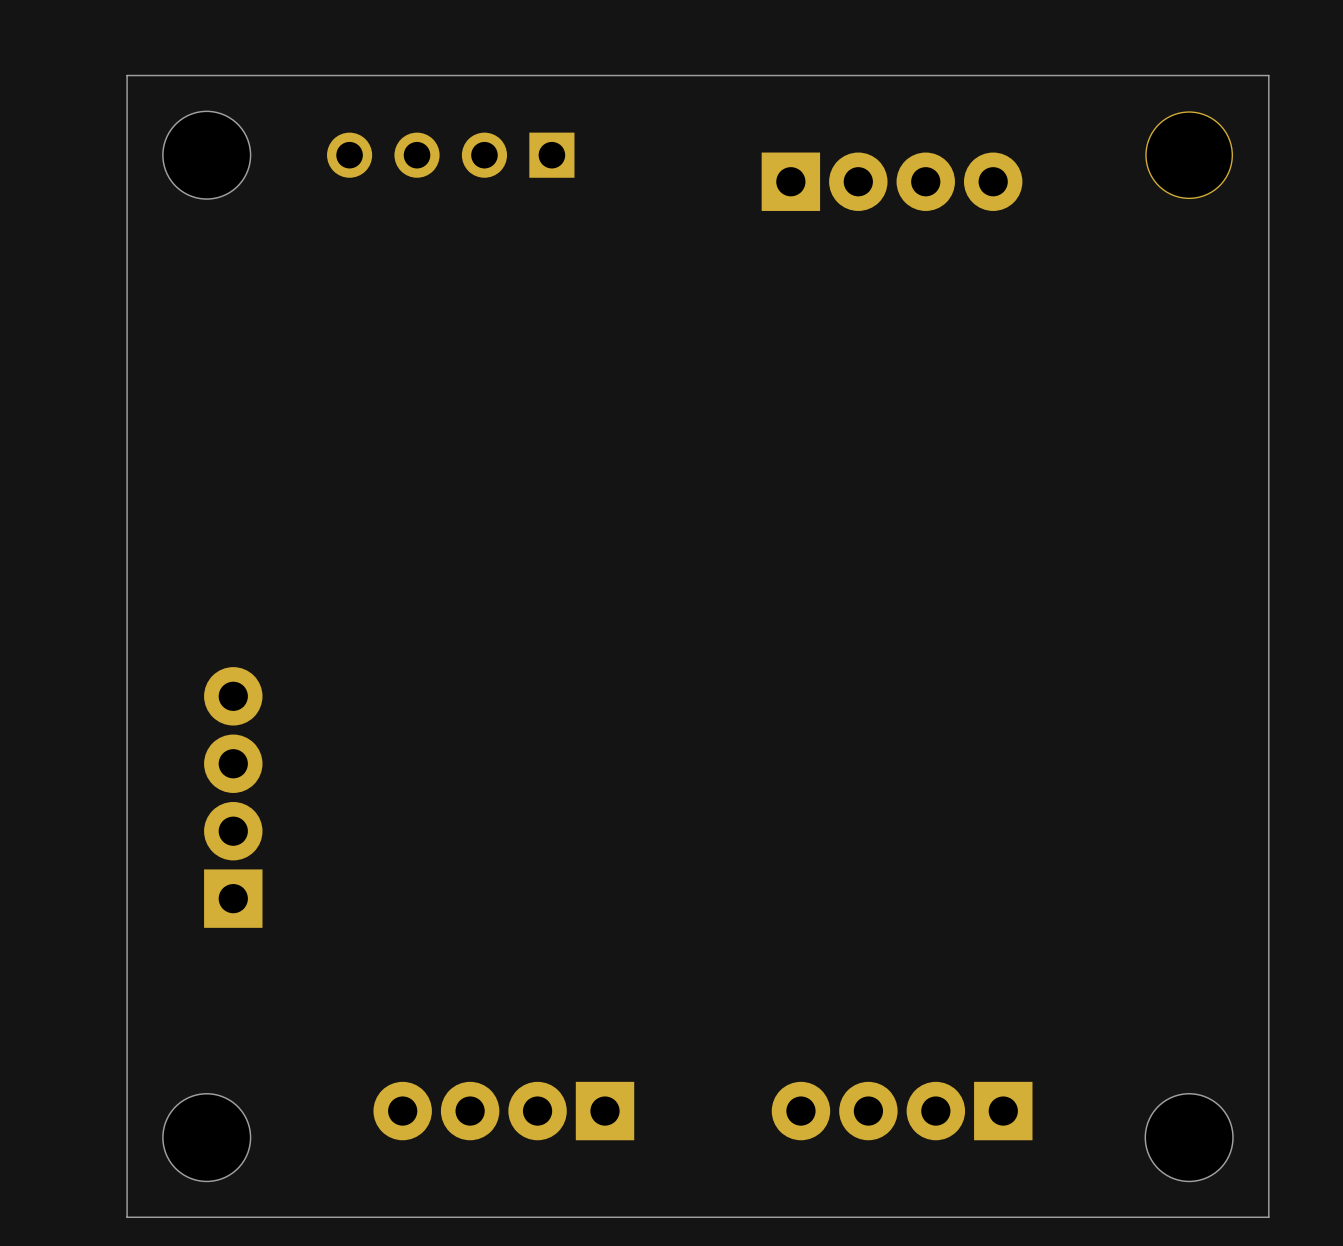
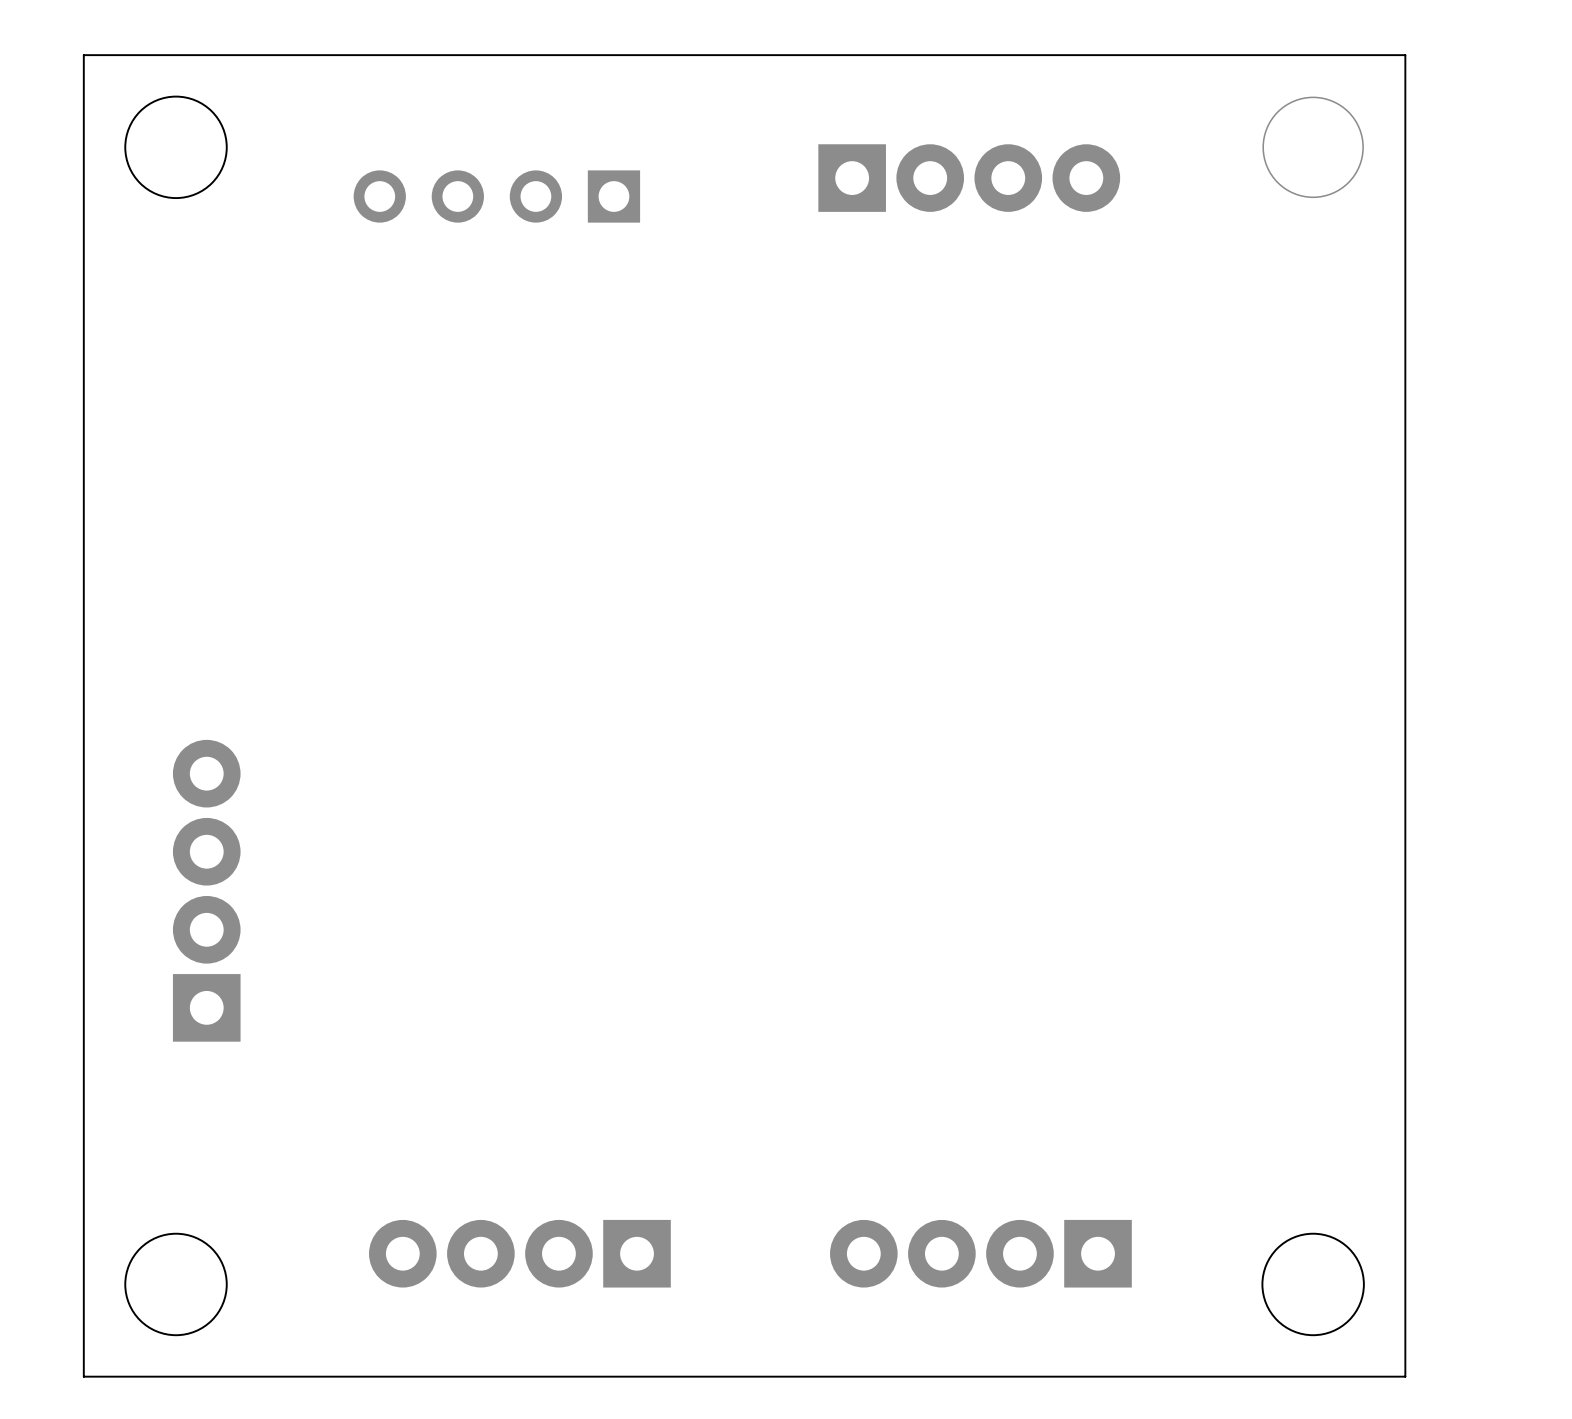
part position: (450, 155) -> (496, 196)

